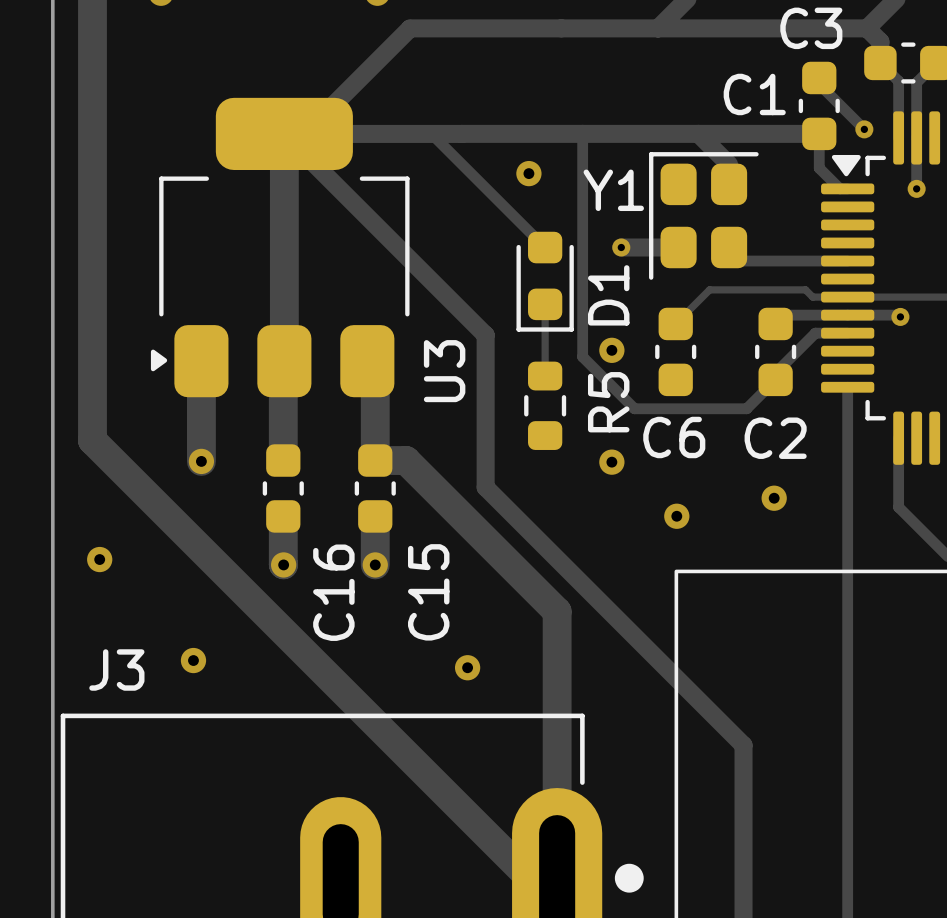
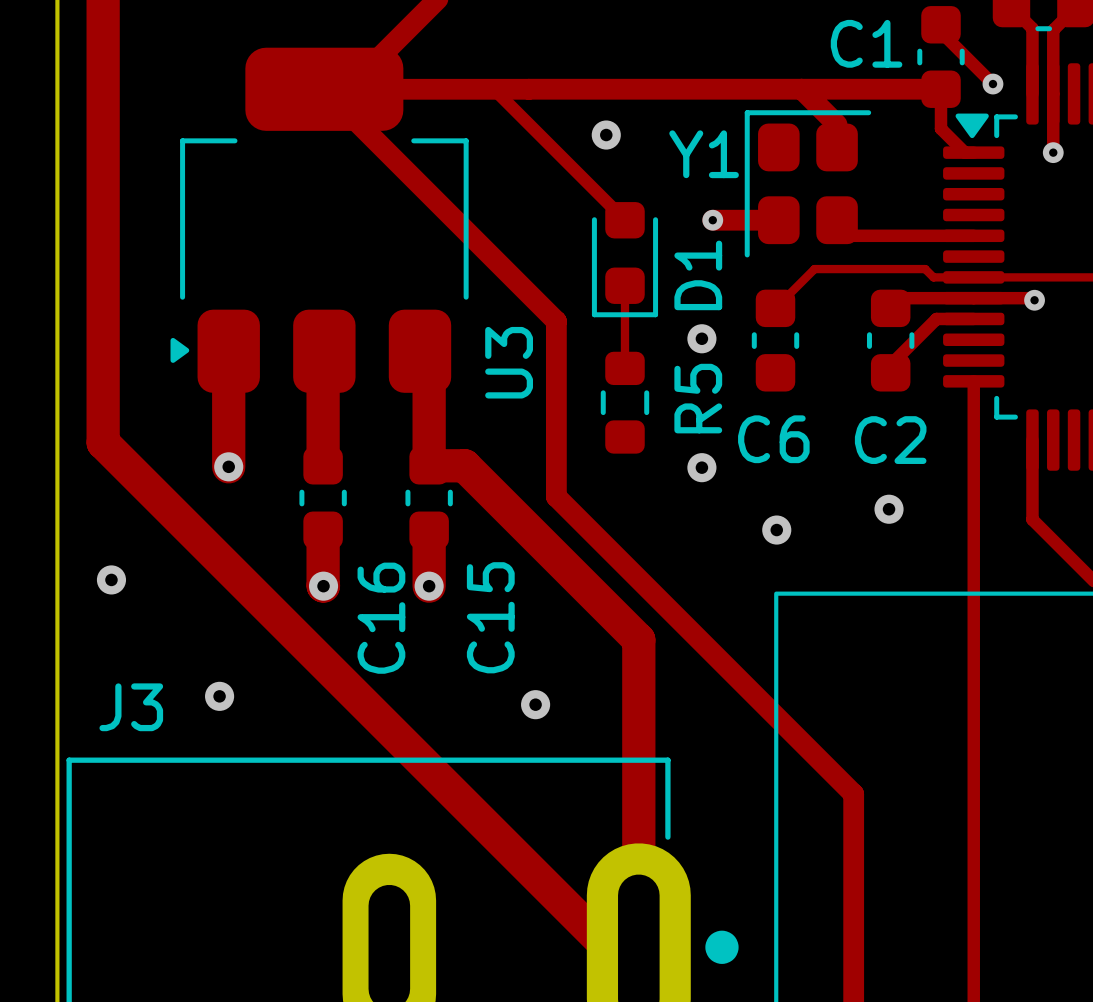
track: (284, 133) (284, 361) -> none
track: (582, 133) (582, 356) (634, 408) (746, 408) (775, 379) -> none

